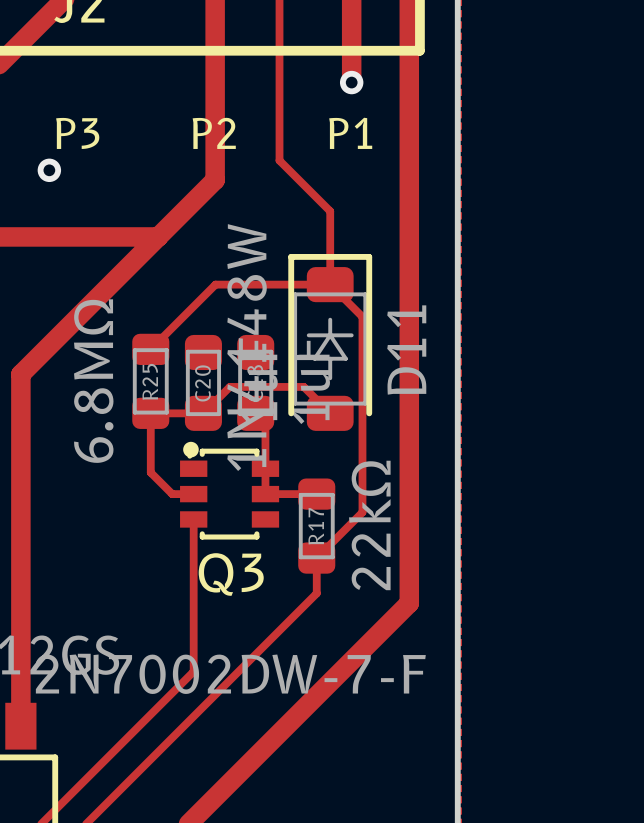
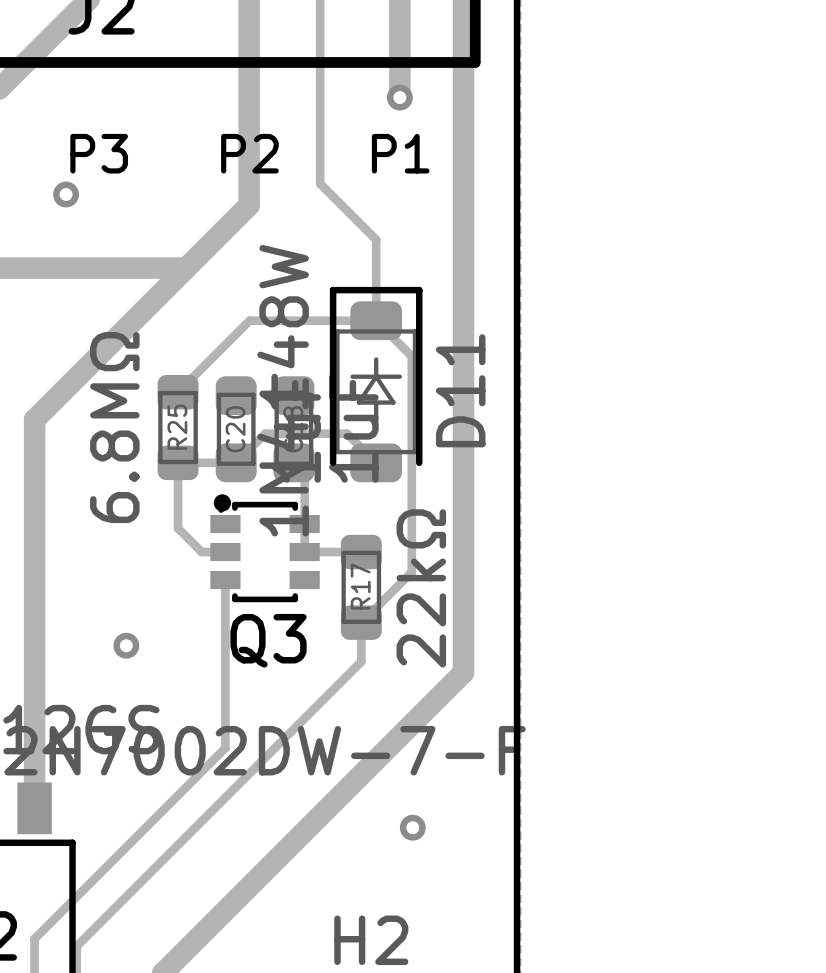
via: none -> (126, 645)
via: none -> (412, 827)

